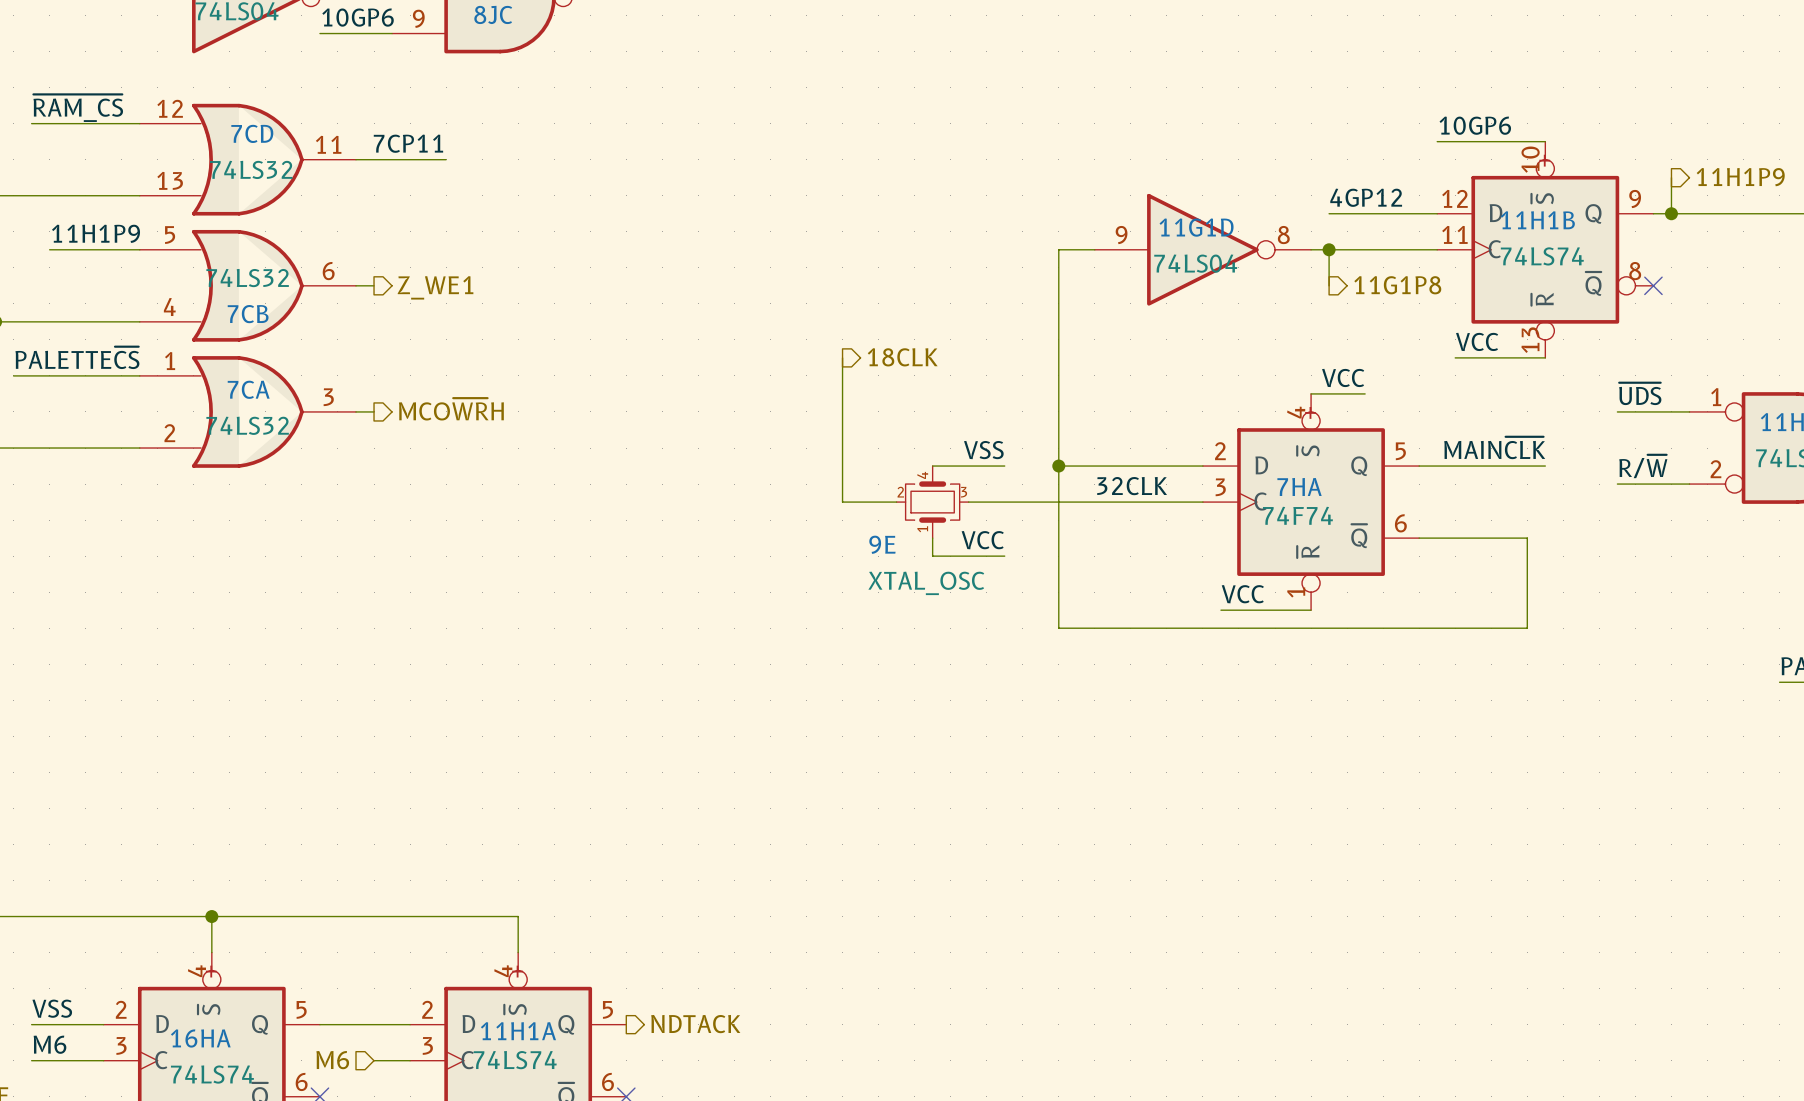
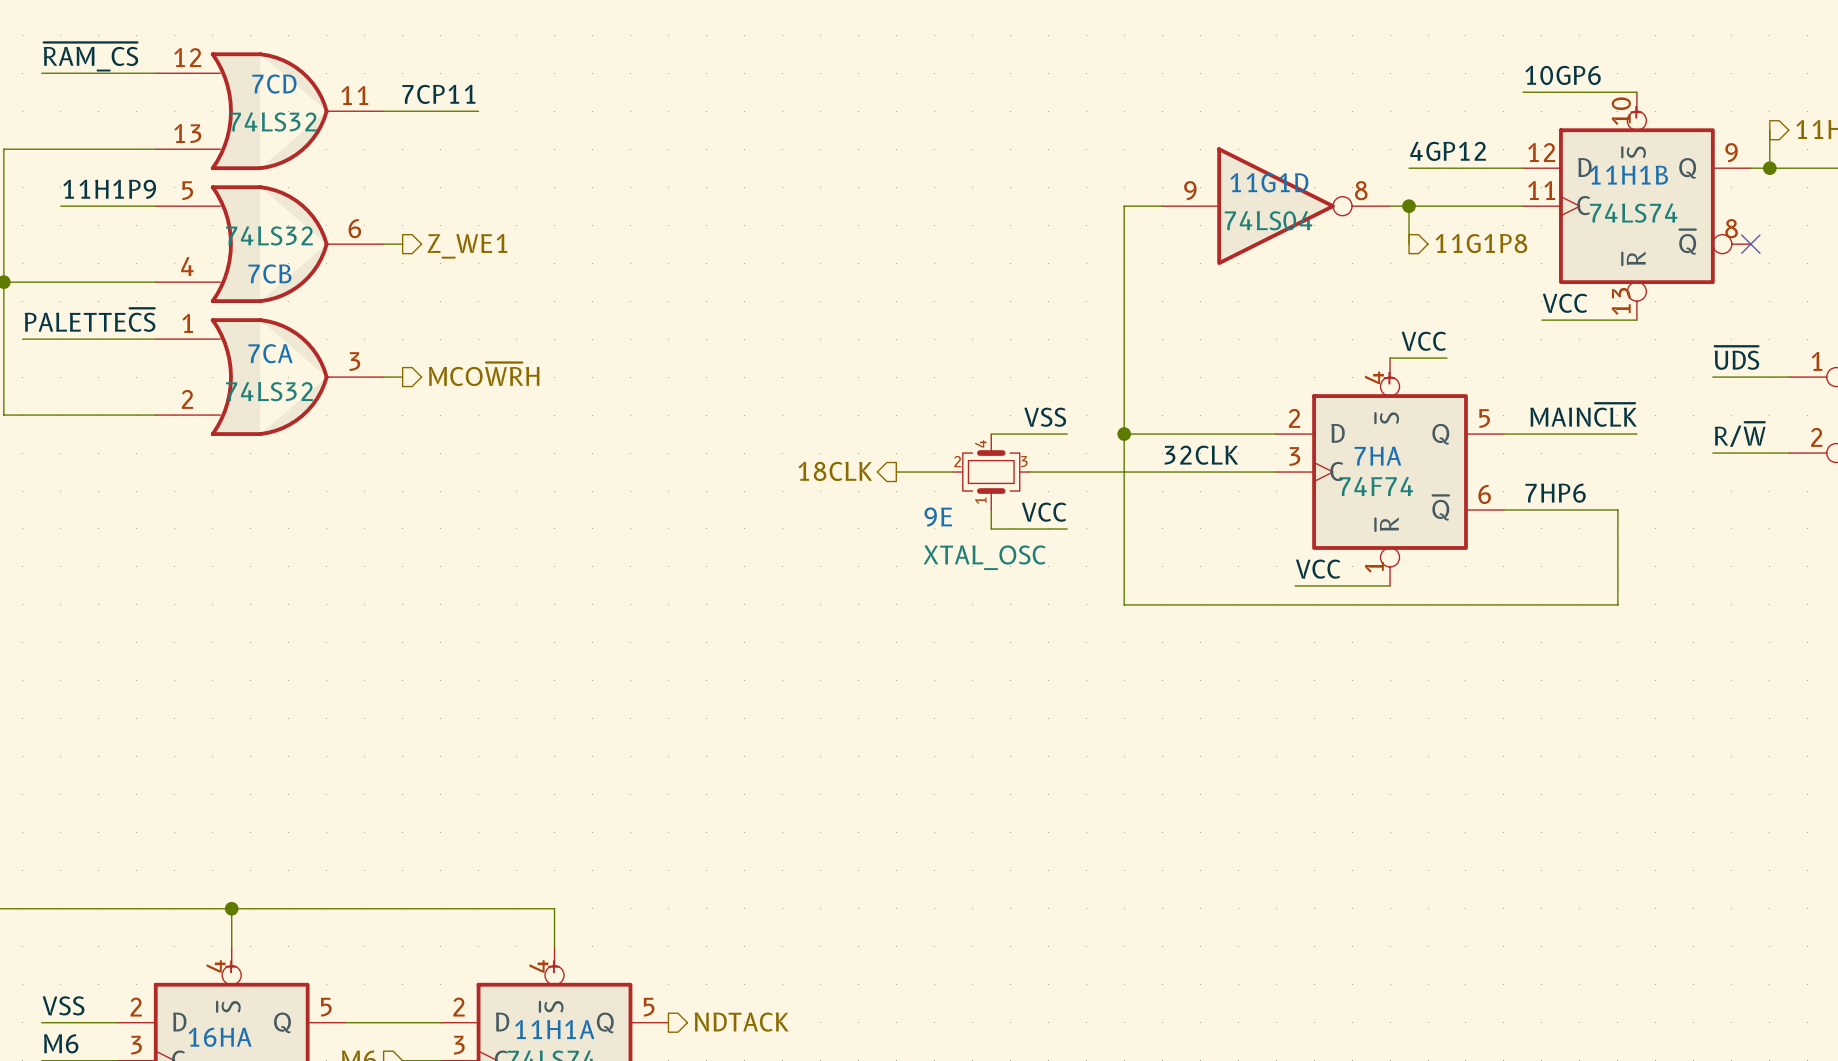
wire: (842, 357) (842, 502) -> none
hierarchical label rotation: 0° (902, 357) -> 180° (835, 471)
hierarchical label position: 18CLK (902, 357) -> 18CLK (835, 471)
label: none -> 7HP6 (1555, 493)

